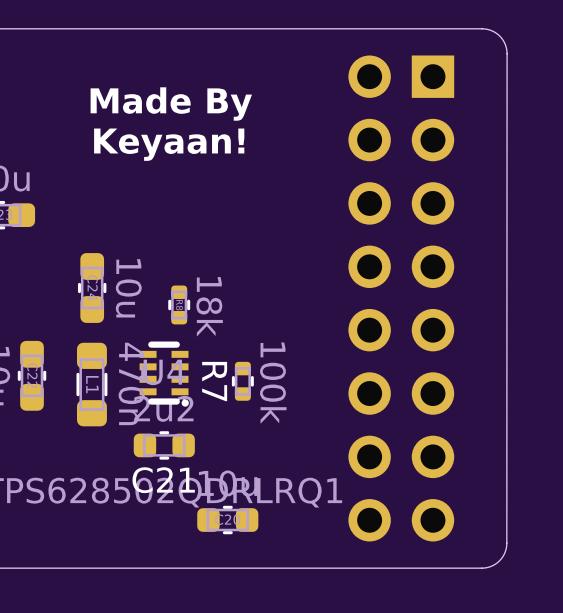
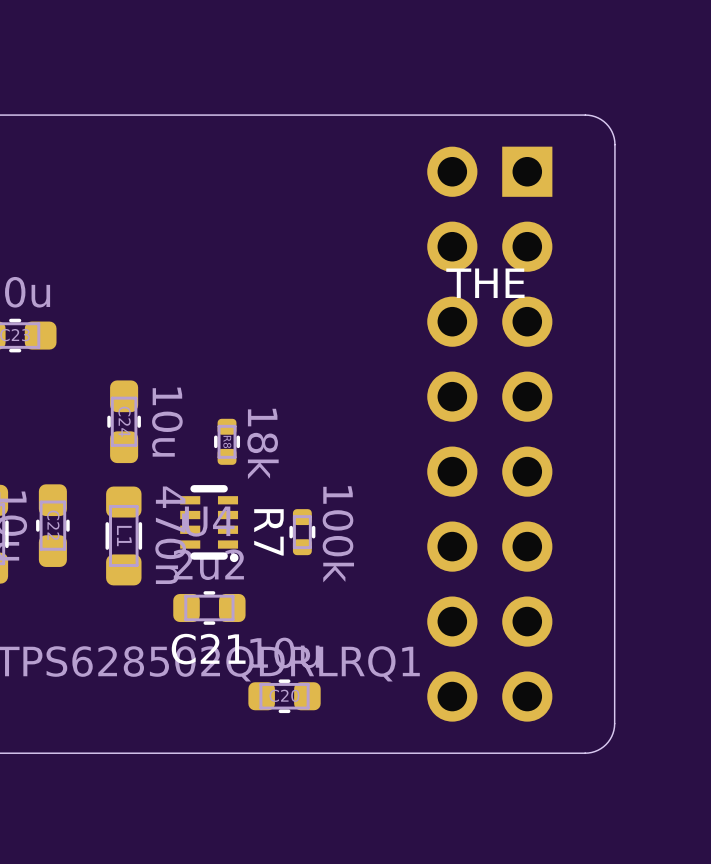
text: Made By (171, 104) -> none
text: Keyaan! (169, 144) -> none
text: none -> THE (485, 283)

